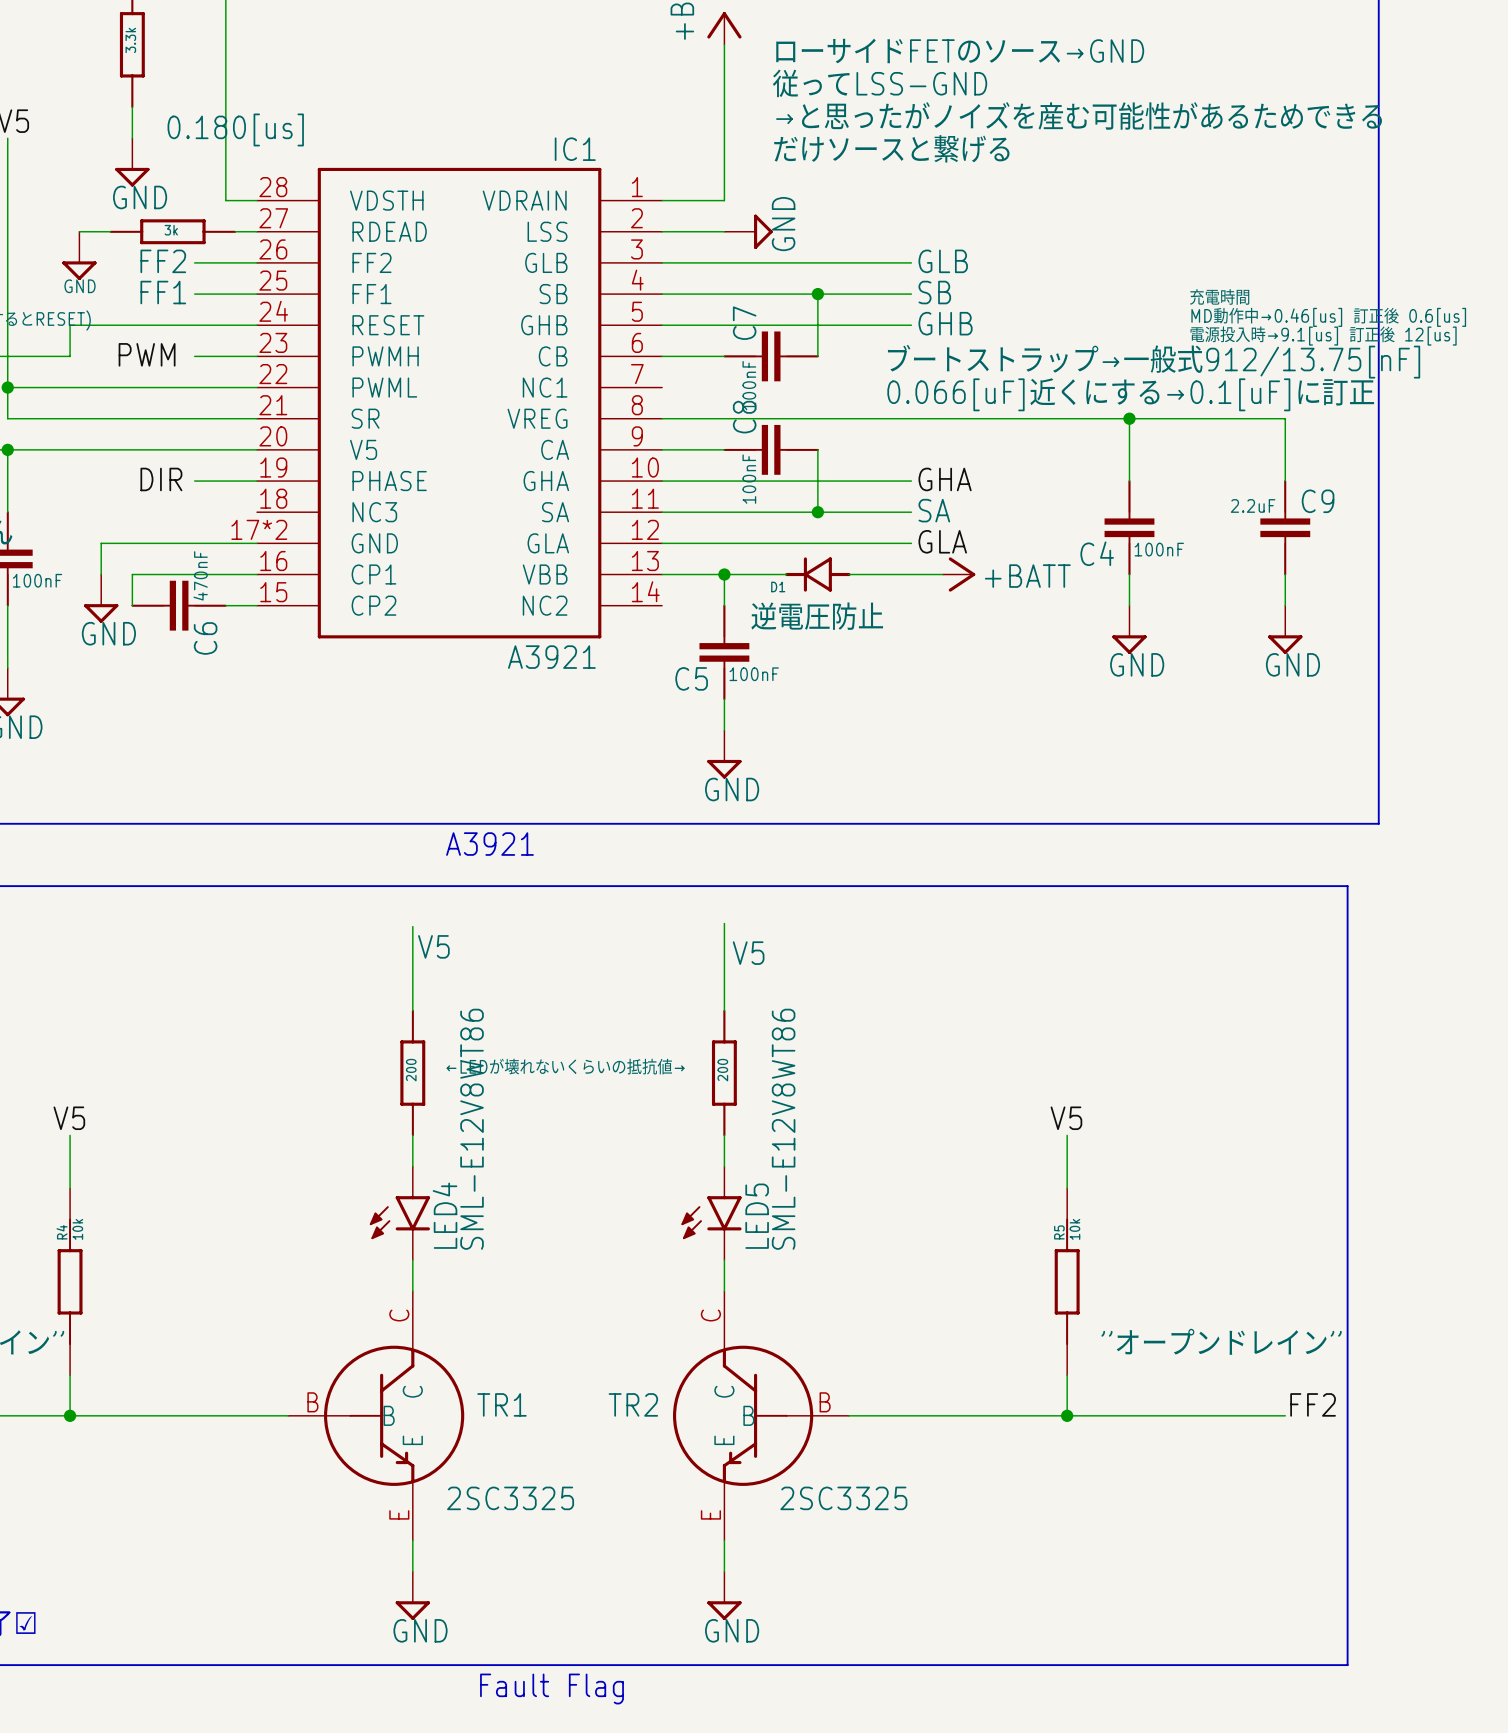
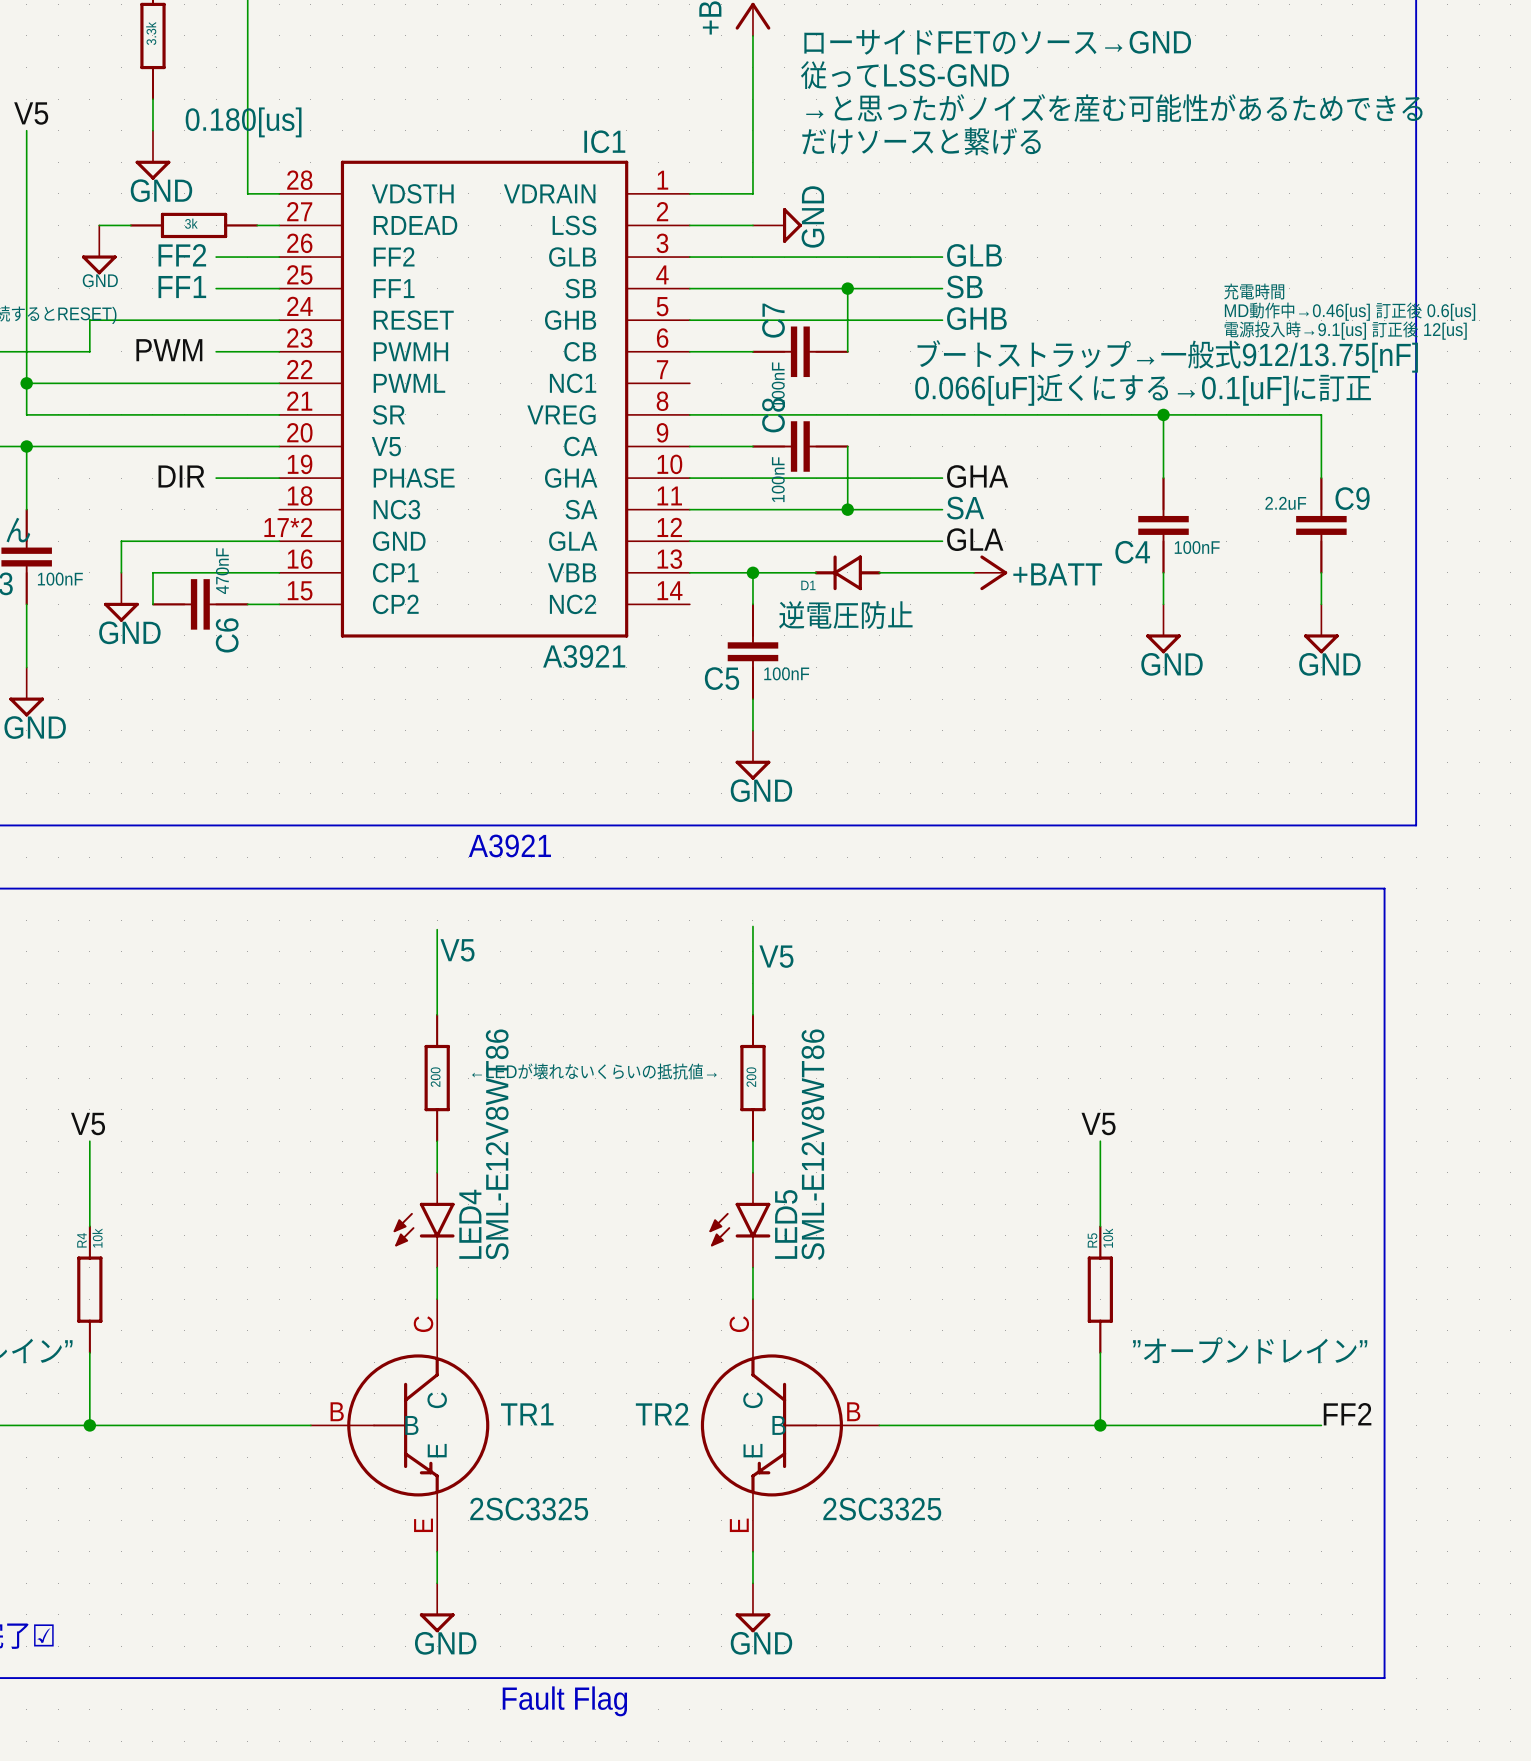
R4 symbol: [57, 1188, 83, 1376] -> [77, 1225, 103, 1354]
R5 symbol: [1054, 1188, 1080, 1376] -> [1087, 1225, 1113, 1354]

